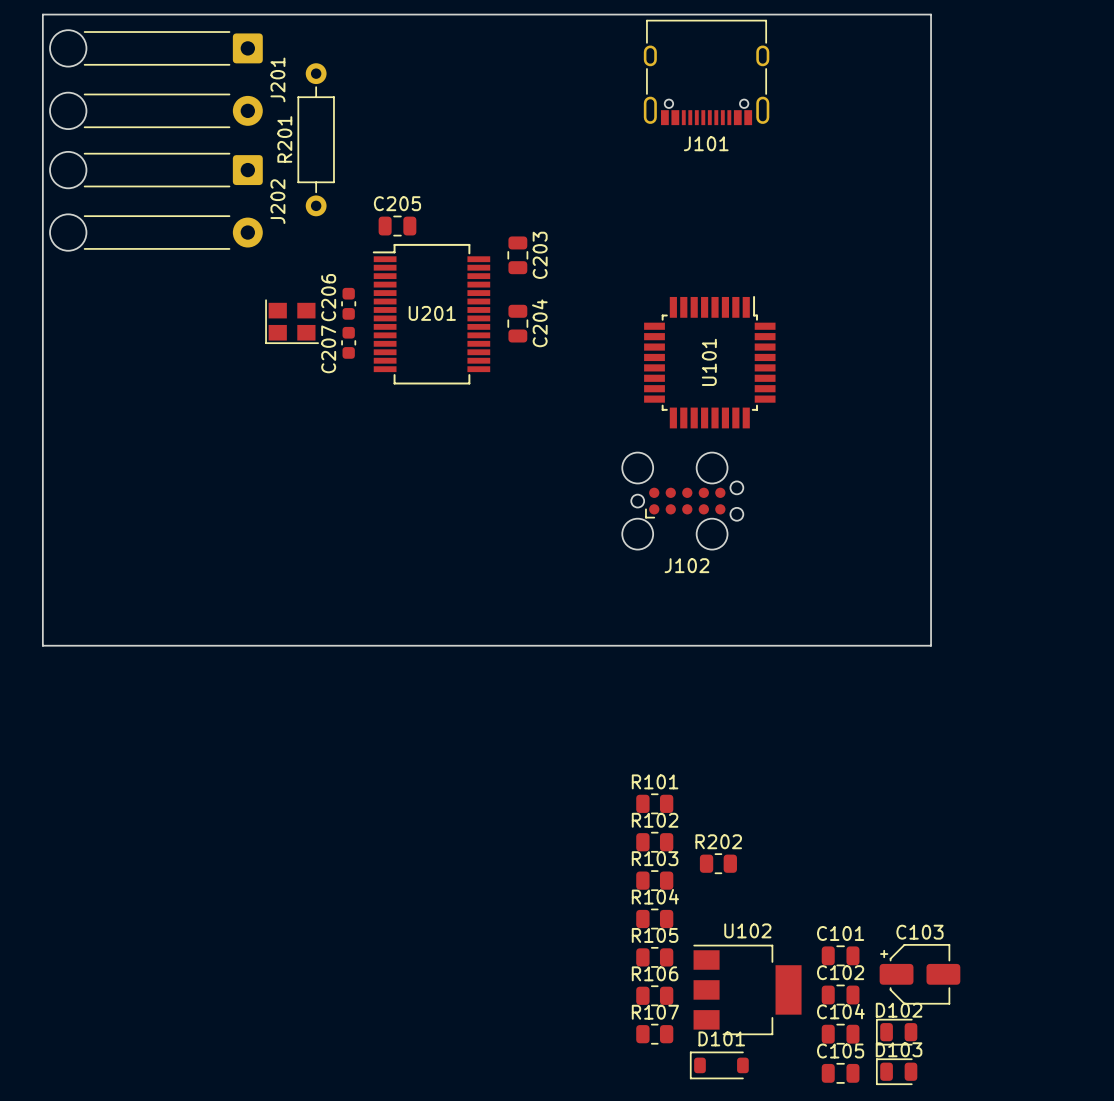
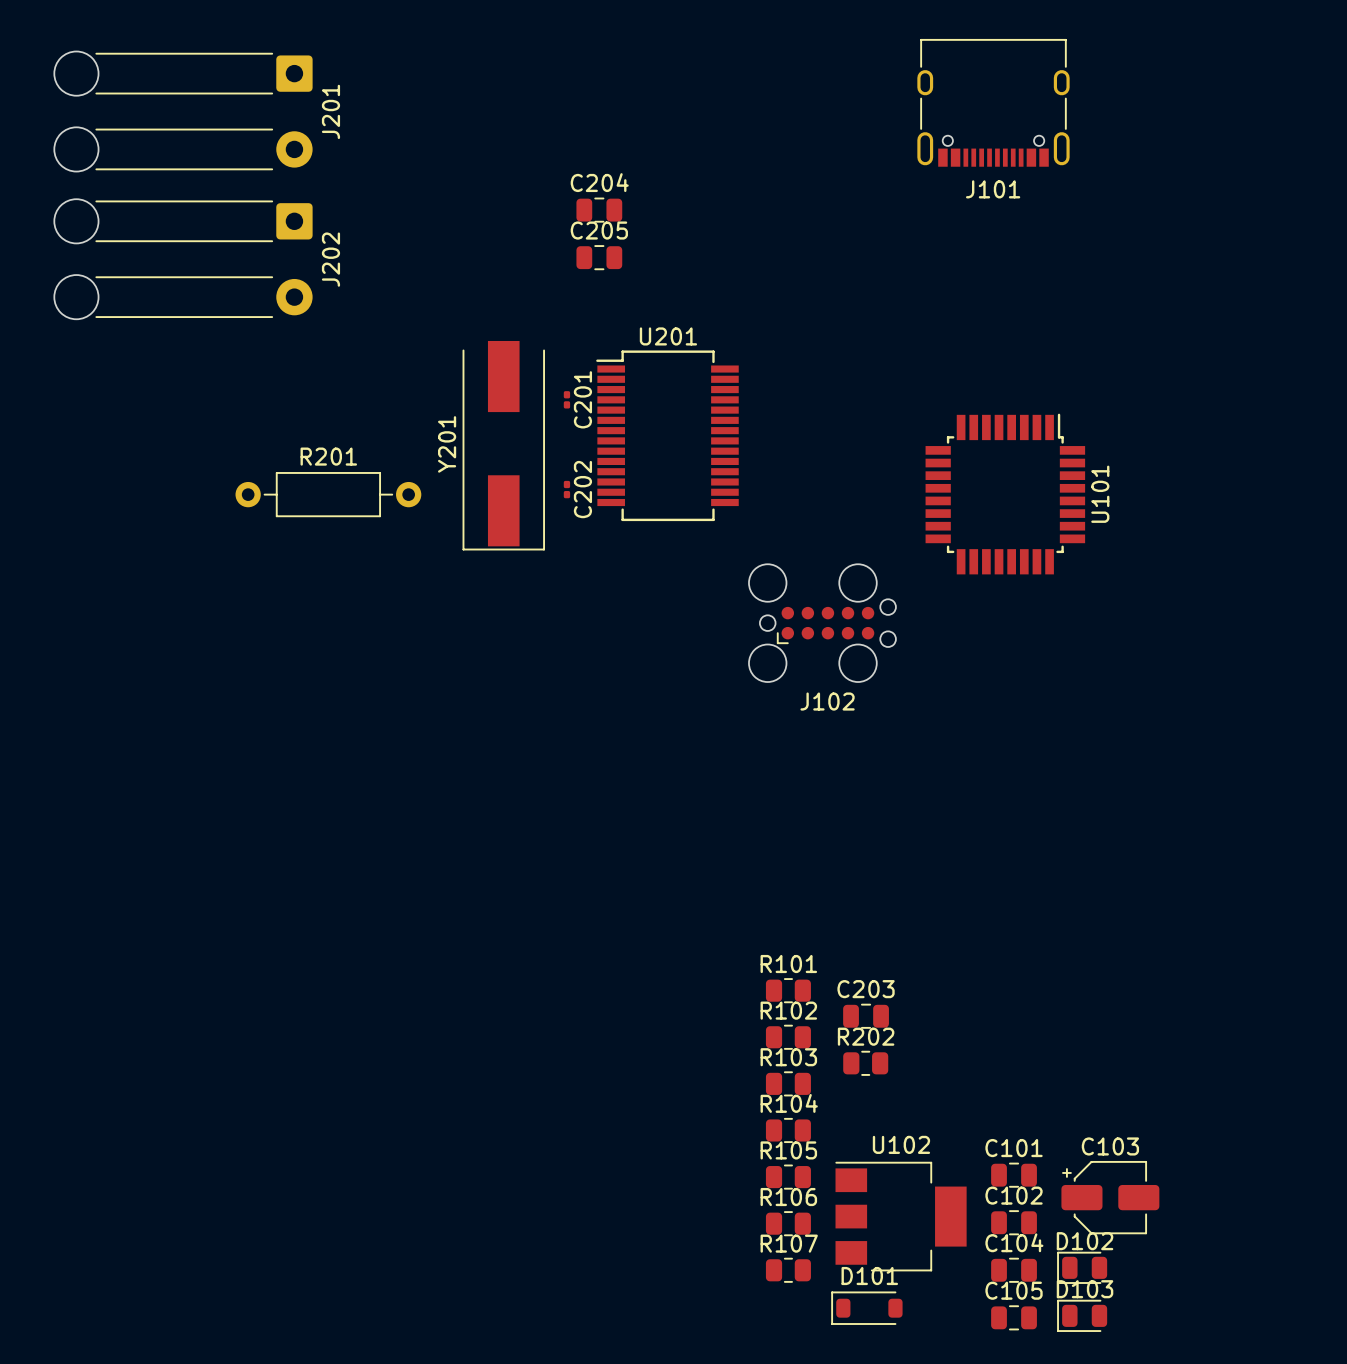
board edge: (42, 14) (931, 14) (931, 645) (42, 645) (42, 14) -> none
J101 position: (706, 72) -> (993, 102)
R201 rotation: 0° (316, 139) -> 90° clockwise (328, 494)
R201 position: (316, 139) -> (328, 494)
C205 position: (397, 226) -> (599, 257)
C203 rotation: 0° (517, 255) -> 90° clockwise (866, 1016)
C203 position: (517, 255) -> (866, 1016)
C203 name position: C203 (540, 255) -> C203 (866, 989)
C206: (348, 303) -> none
U201 name position: U201 (432, 313) -> U201 (668, 336)
U201 position: (431, 314) -> (667, 435)
C201: none -> (566, 399)
part: (292, 321) -> none
C204 rotation: 0° (517, 323) -> 90° clockwise (599, 210)
C204 position: (517, 323) -> (599, 210)
C204 name position: C204 (539, 323) -> C204 (599, 182)
C207: (348, 342) -> none
Y201: none -> (503, 445)
U101 position: (709, 362) -> (1005, 494)
U101 name position: U101 (709, 362) -> U101 (1100, 494)
C202: none -> (566, 489)

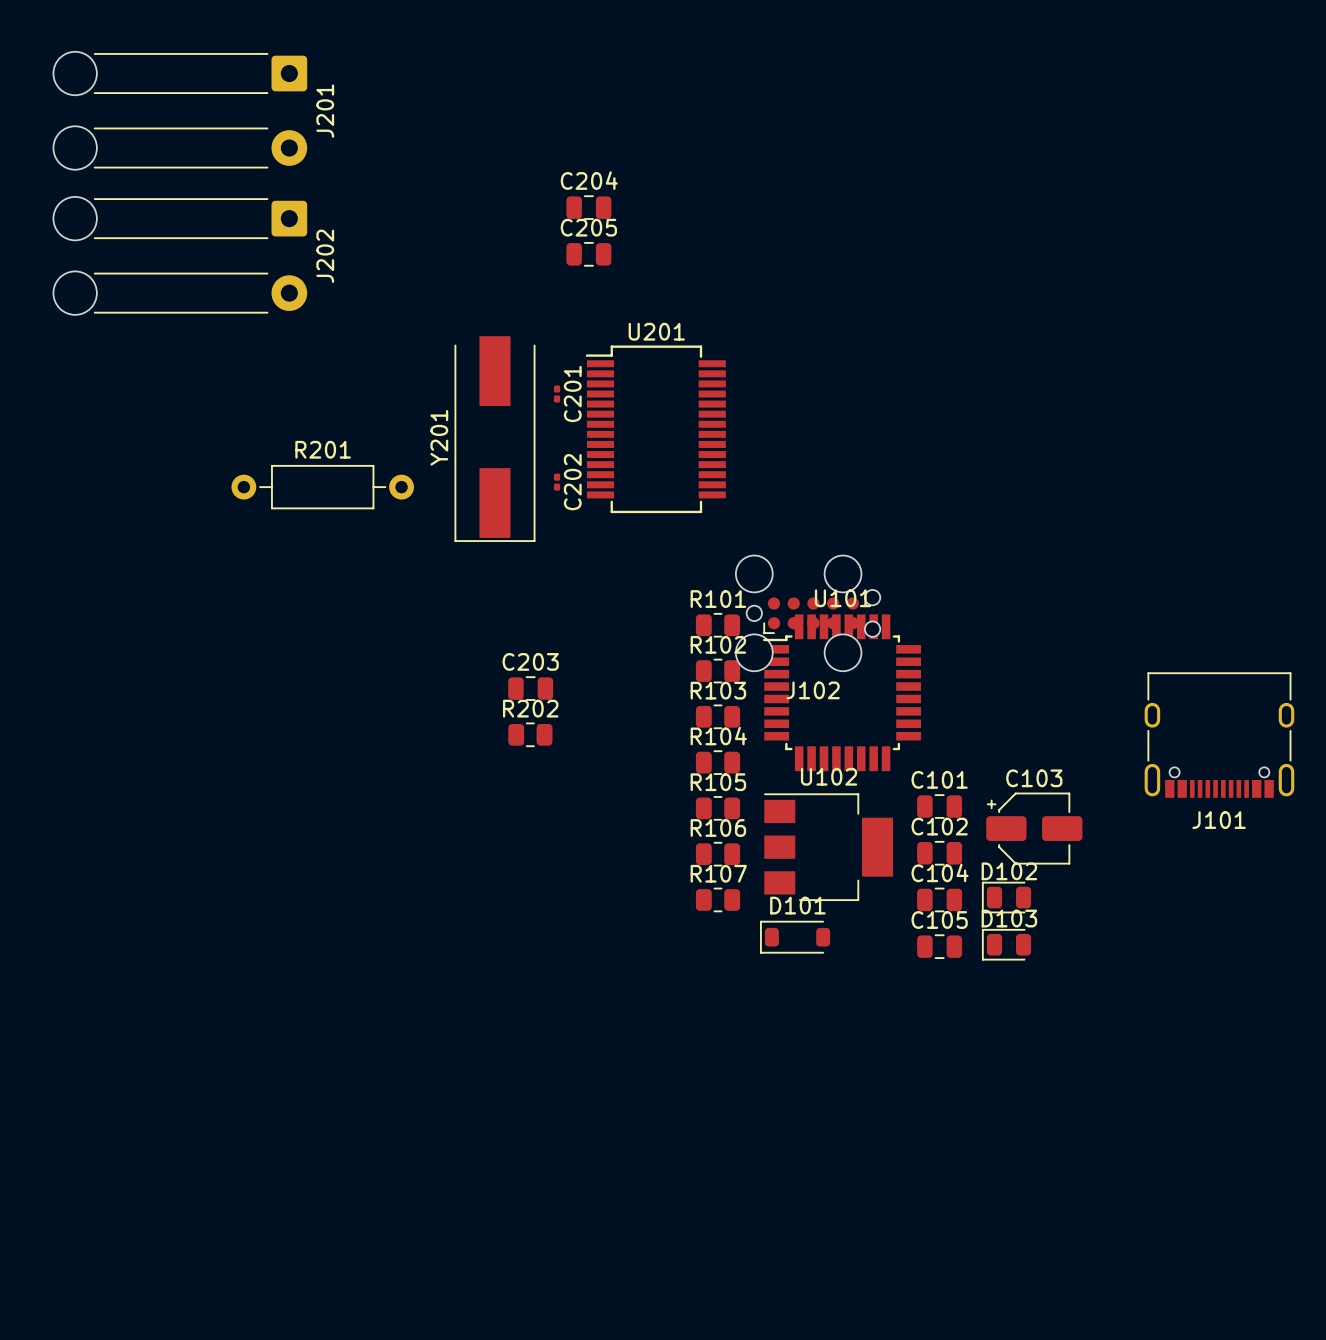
J101 position: (993, 102) -> (1219, 735)
U101 rotation: 0° (1005, 494) -> 90° counterclockwise (842, 692)
U101 position: (1005, 494) -> (842, 692)
R101 position: (788, 990) -> (718, 625)
C203 position: (866, 1016) -> (530, 688)
R102 position: (788, 1037) -> (718, 671)
R202 position: (865, 1063) -> (530, 734)
R103 position: (788, 1083) -> (718, 716)
R104 position: (788, 1130) -> (718, 762)
C101 position: (1014, 1175) -> (939, 806)
R105 position: (788, 1177) -> (718, 808)
C103 position: (1110, 1197) -> (1034, 828)
U102 position: (900, 1216) -> (828, 847)
C102 position: (1014, 1222) -> (939, 853)
R106 position: (788, 1223) -> (718, 854)
D102 position: (1082, 1267) -> (1006, 897)
R107 position: (788, 1270) -> (718, 899)
C104 position: (1014, 1270) -> (939, 899)
D101 position: (866, 1308) -> (795, 937)
D103 position: (1082, 1315) -> (1006, 944)
C105 position: (1014, 1317) -> (939, 946)

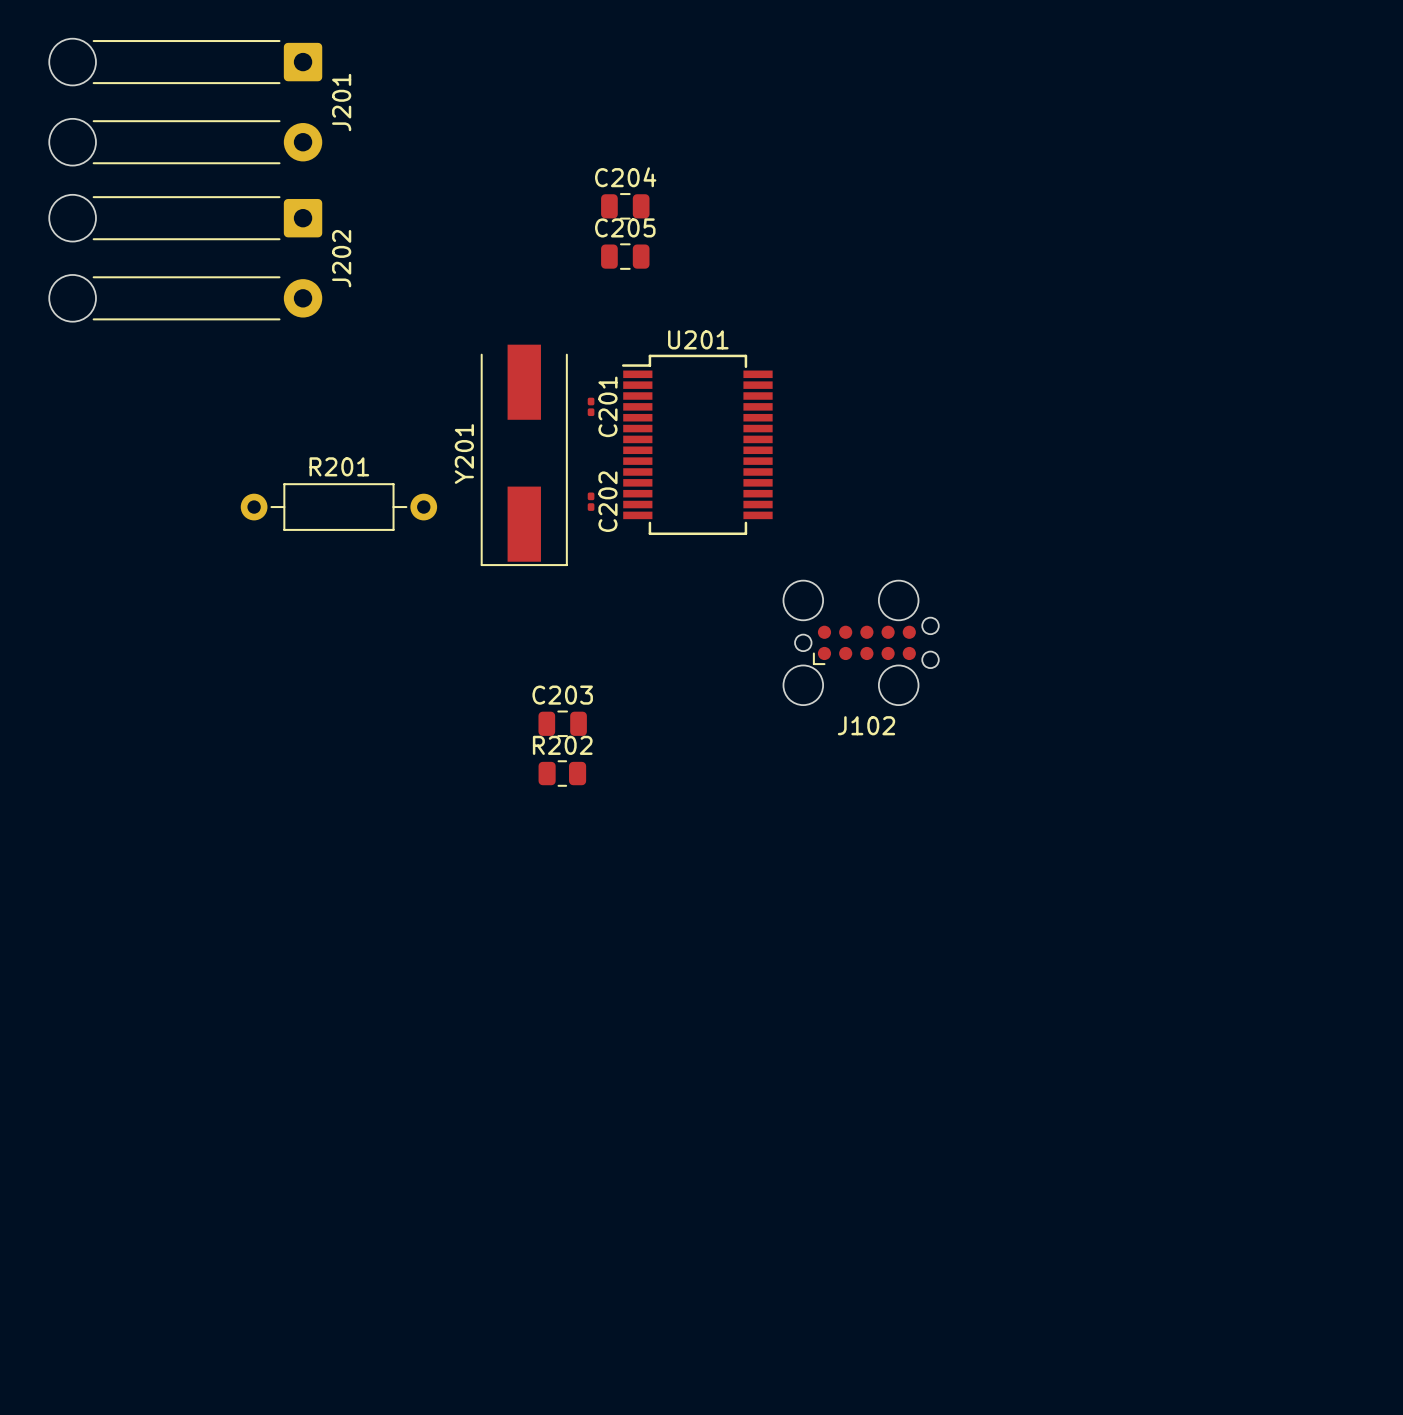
R101: (718, 625) -> none
R102: (718, 671) -> none
U101: (842, 692) -> none
R103: (718, 716) -> none
J101: (1219, 735) -> none
R104: (718, 762) -> none
C101: (939, 806) -> none
R105: (718, 808) -> none
C103: (1034, 828) -> none
U102: (828, 847) -> none
C102: (939, 853) -> none
R106: (718, 854) -> none
D102: (1006, 897) -> none
R107: (718, 899) -> none
C104: (939, 899) -> none
D101: (795, 937) -> none
D103: (1006, 944) -> none
C105: (939, 946) -> none

